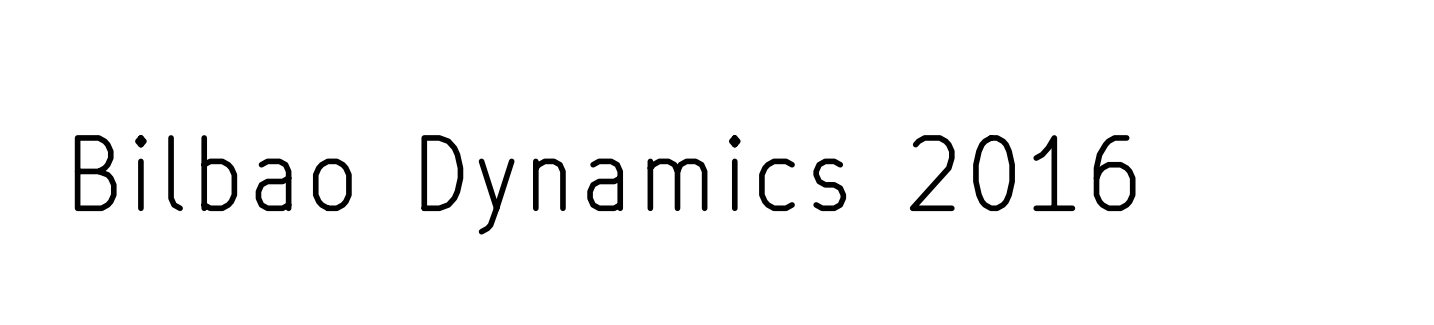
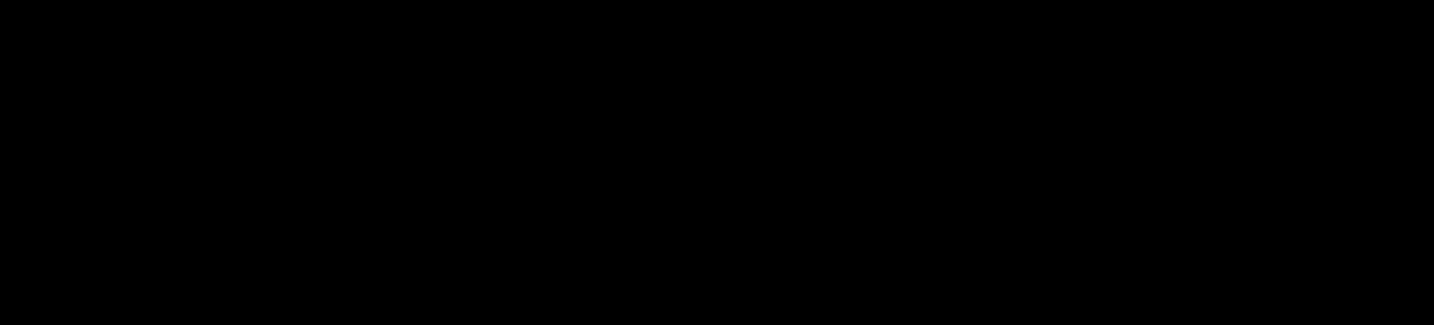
text: Bilbao Dynamics 2016 (605, 184) -> none

